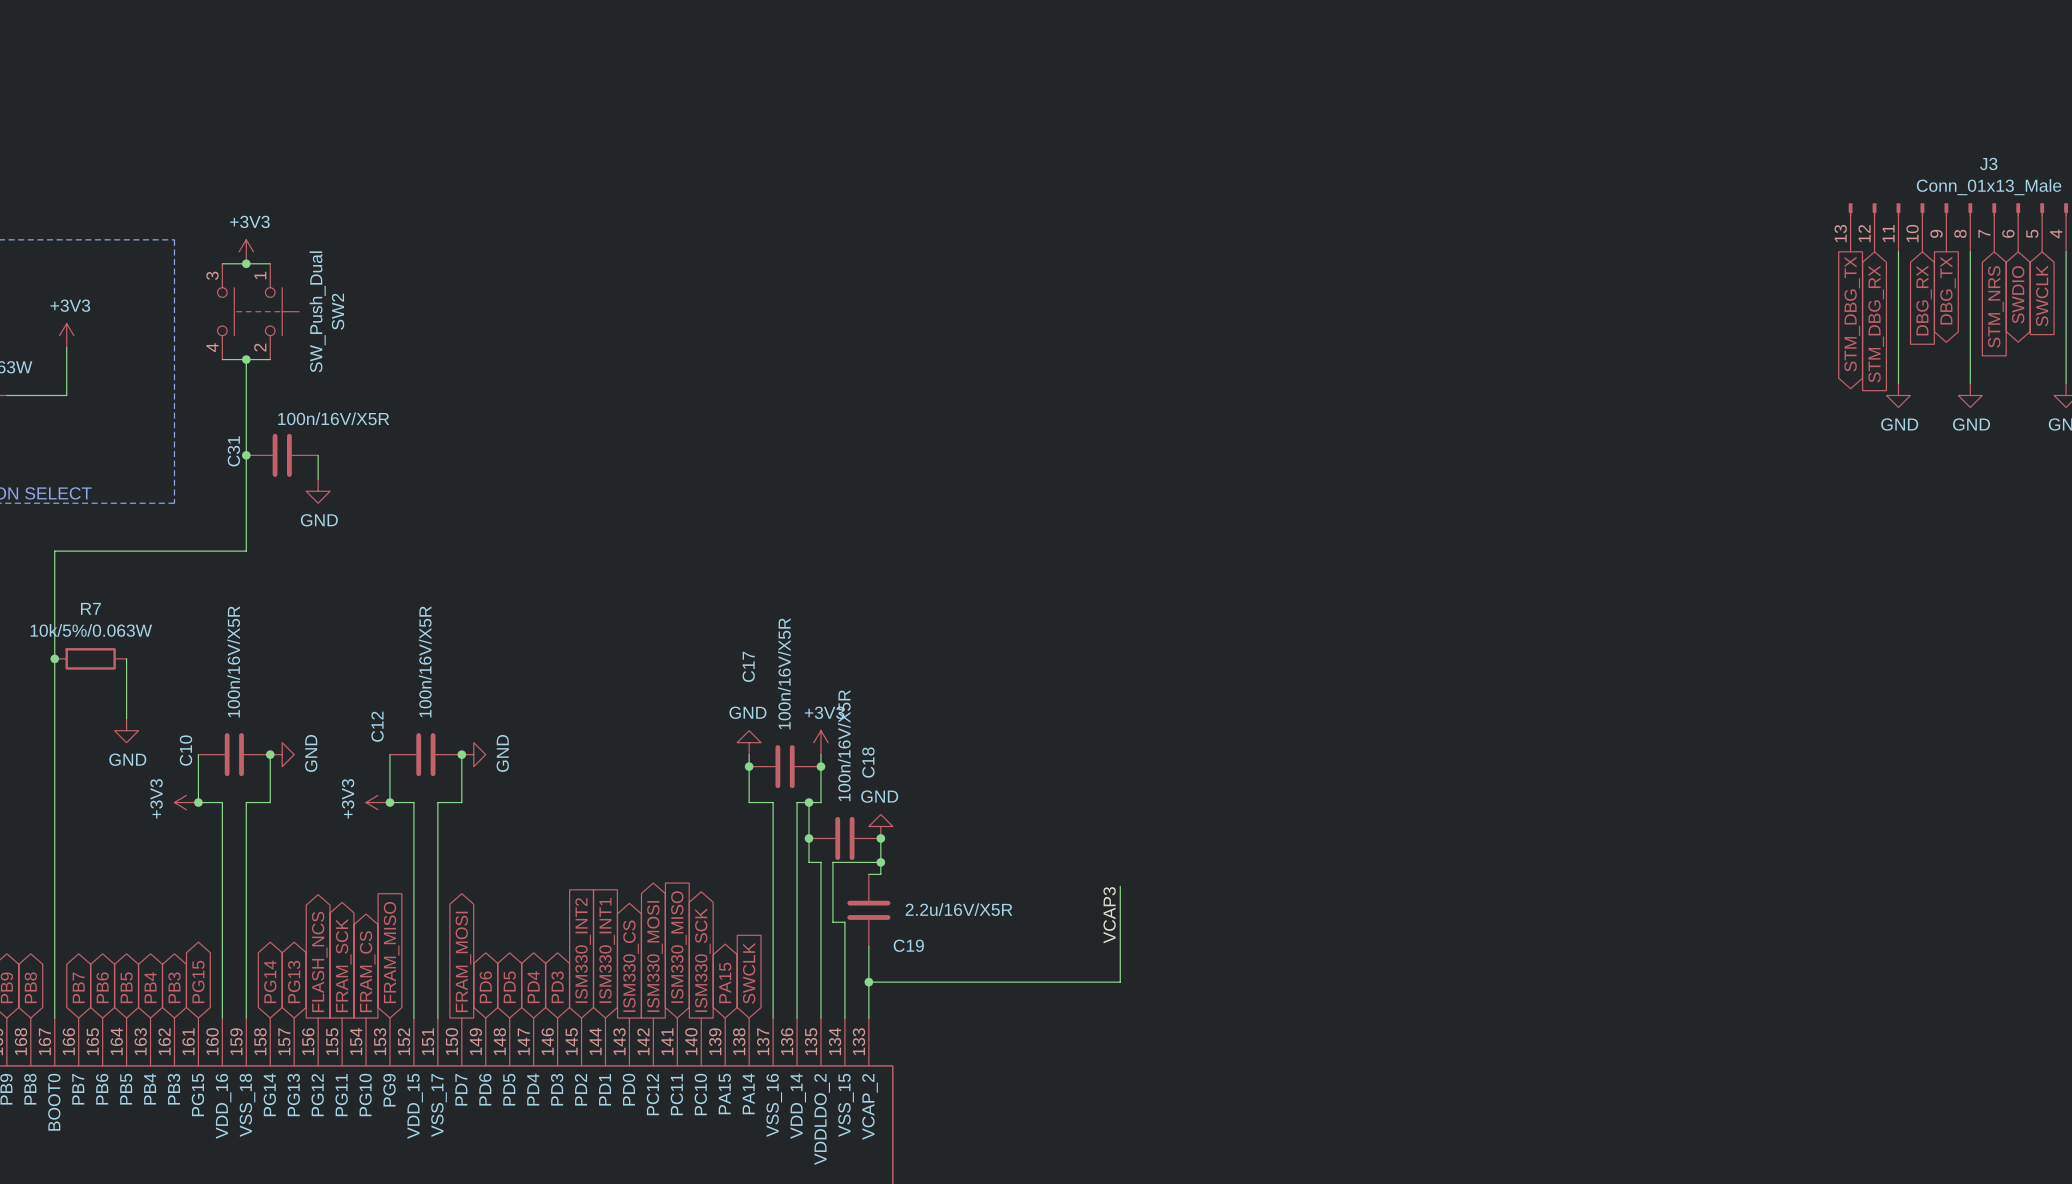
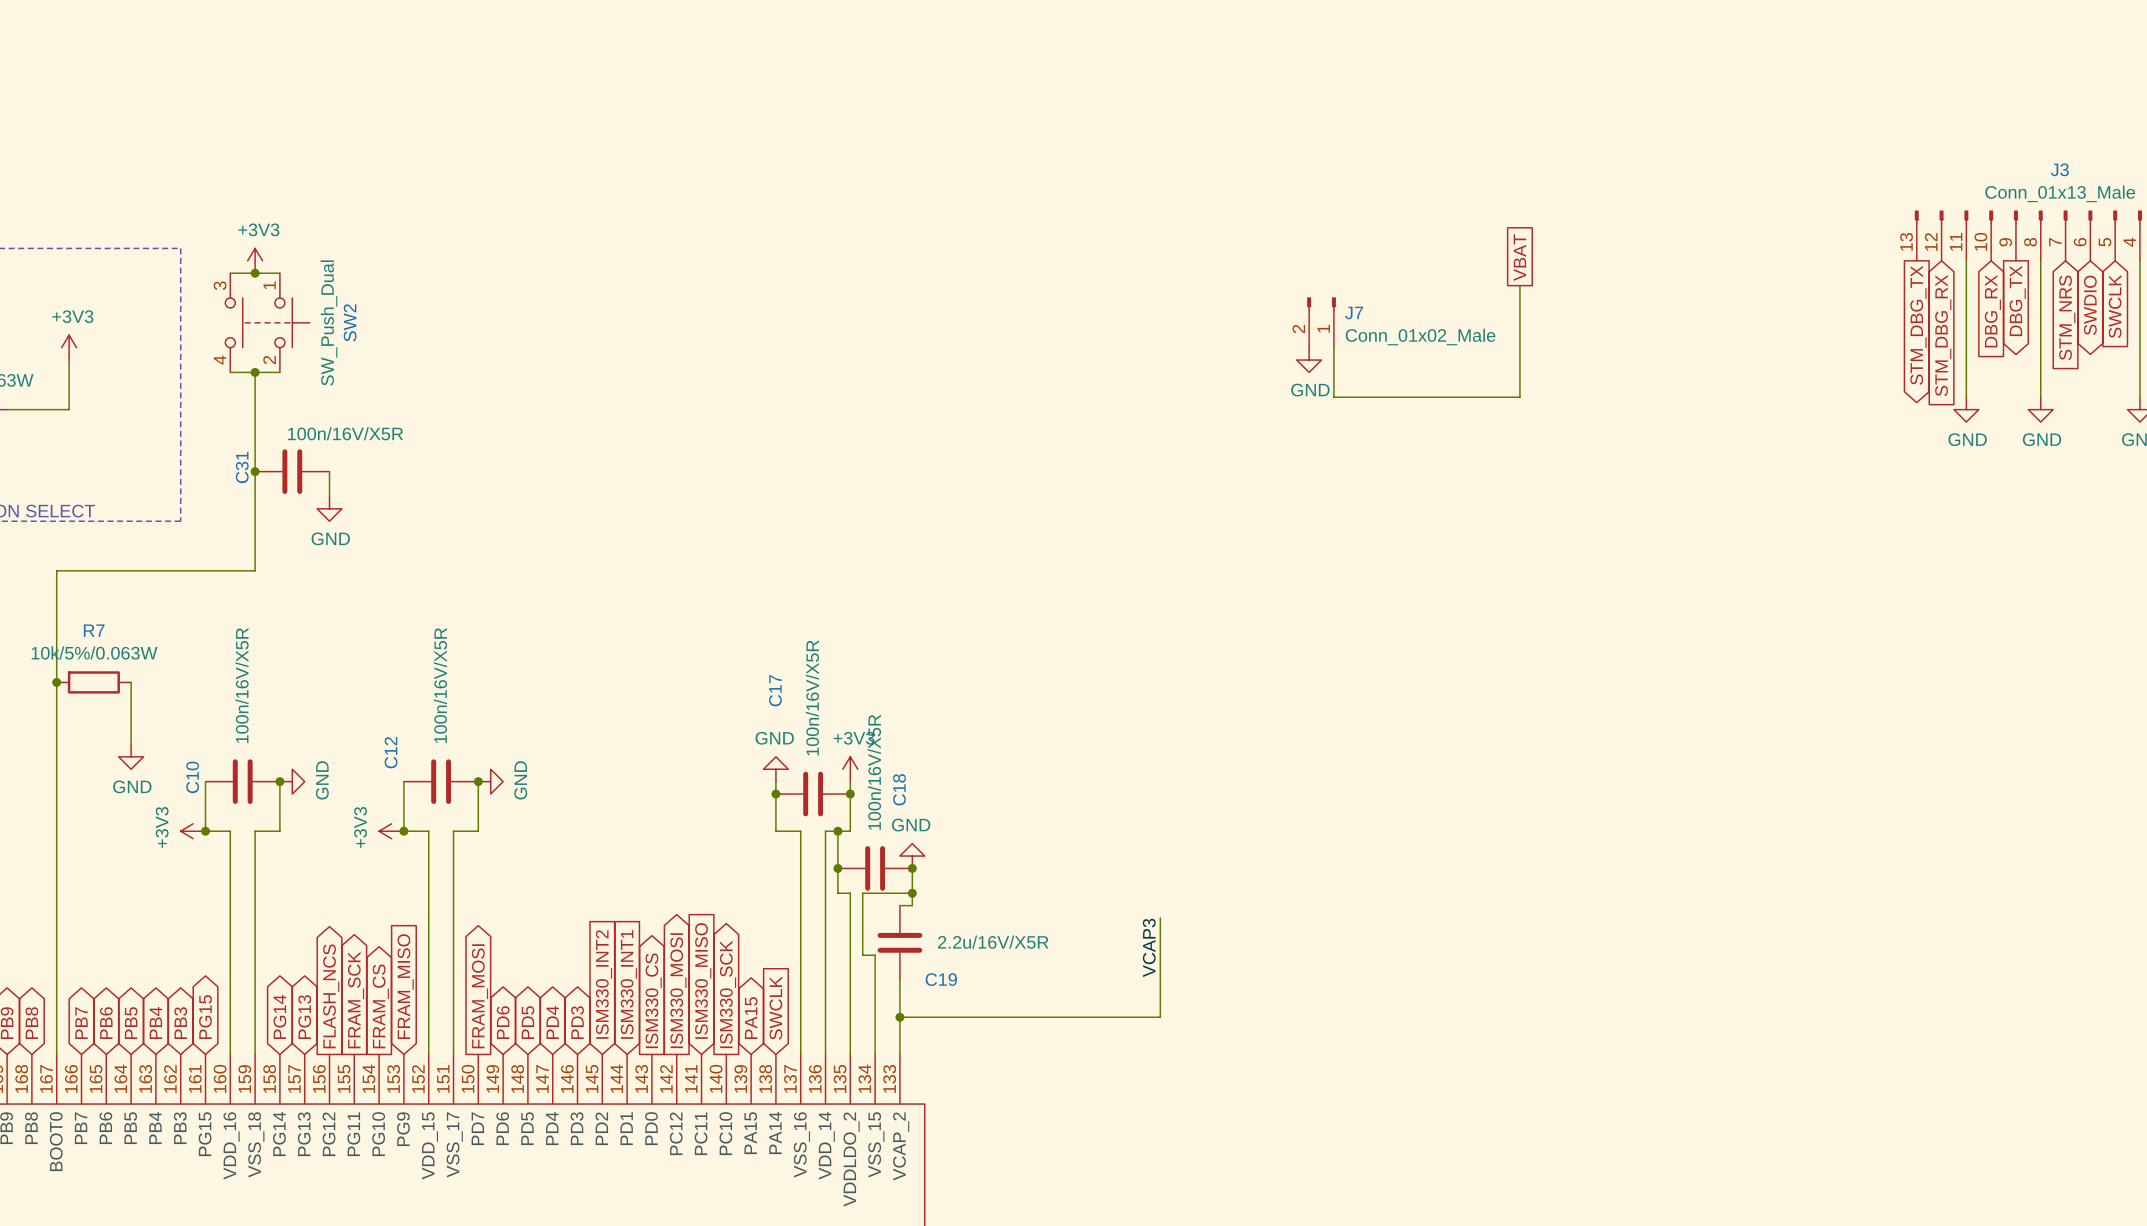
global label: none -> VBAT (1519, 257)
wire: none -> (1519, 285) (1519, 397) (1333, 397) (1333, 347)
J7: none -> Conn_01x02_Male (1321, 322)
power symbol: none -> GND (1309, 360)

